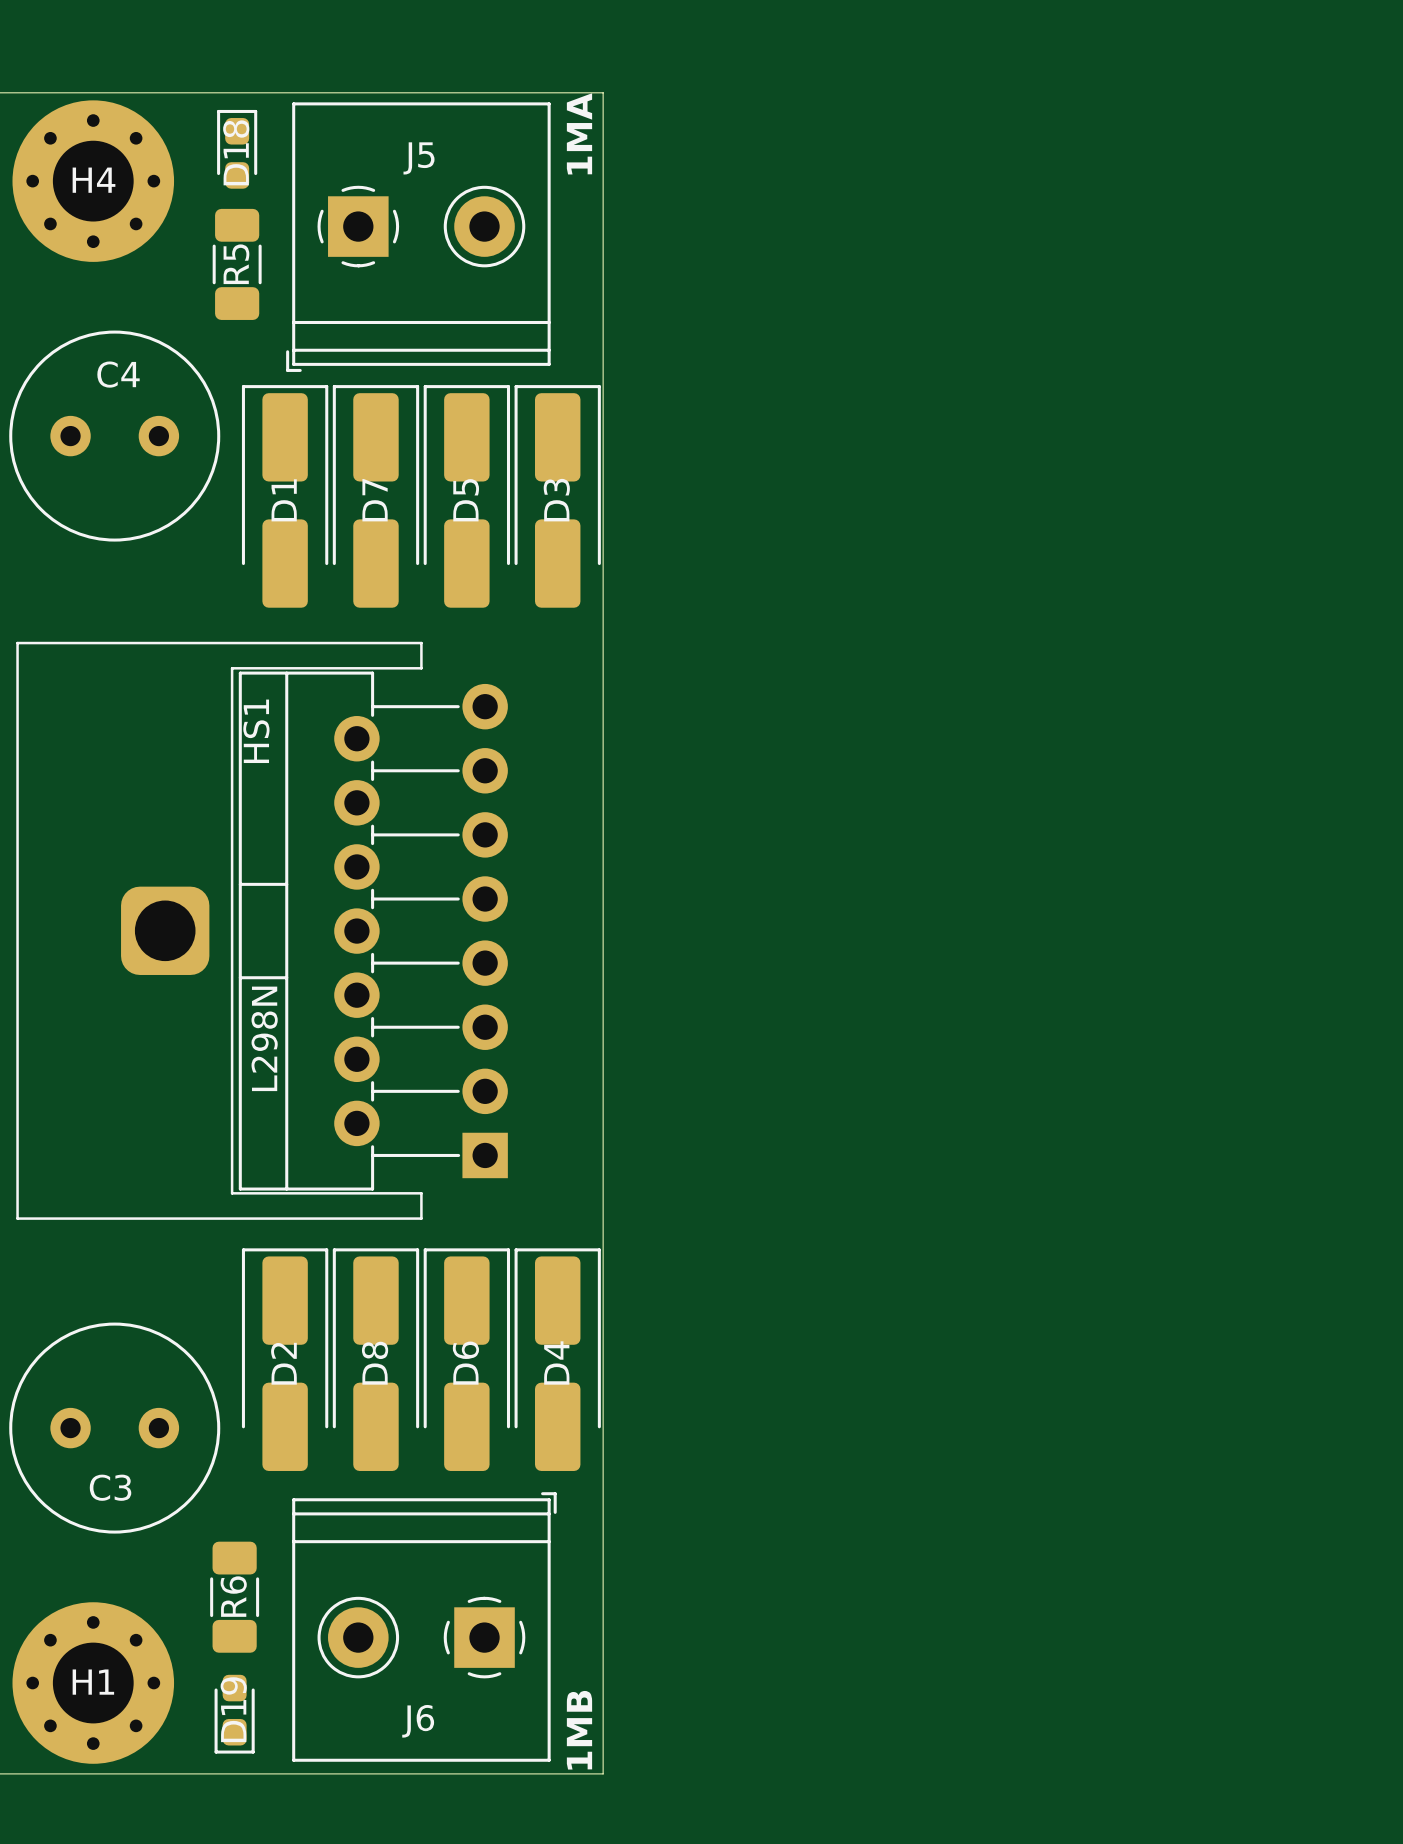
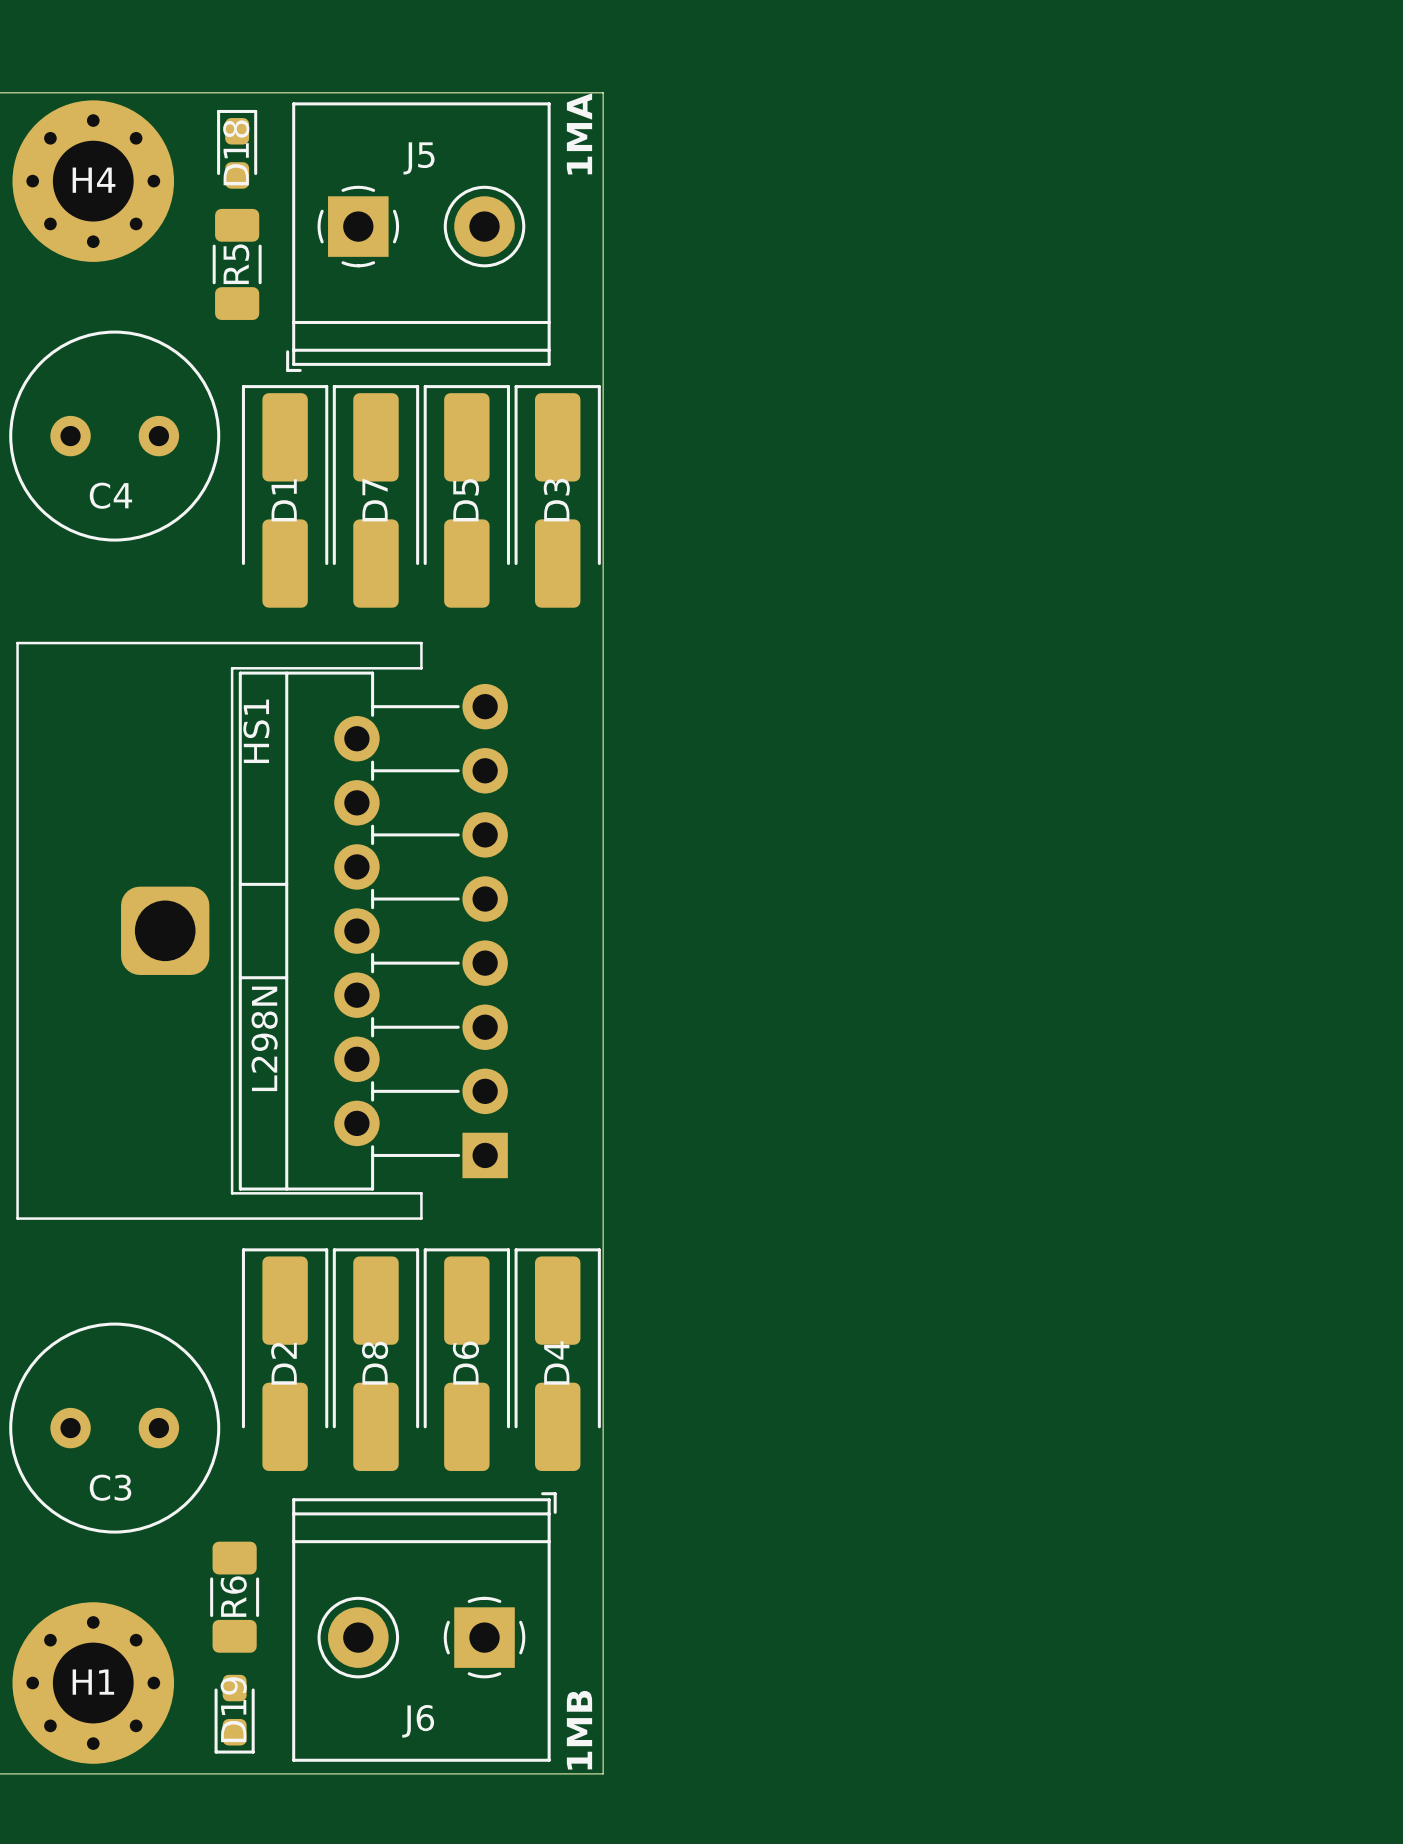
C4 name position: C4 (118, 374) -> C4 (110, 495)

